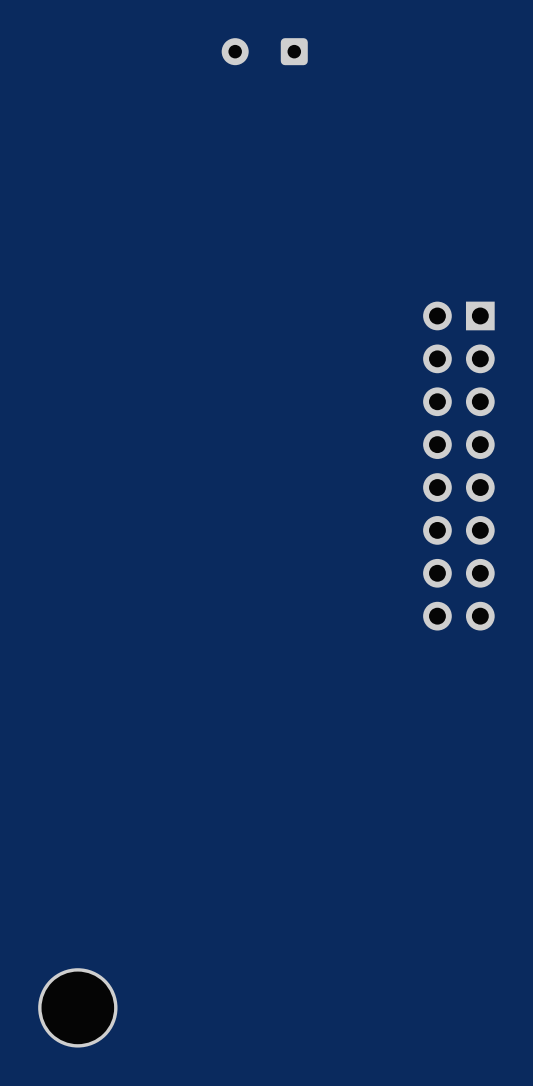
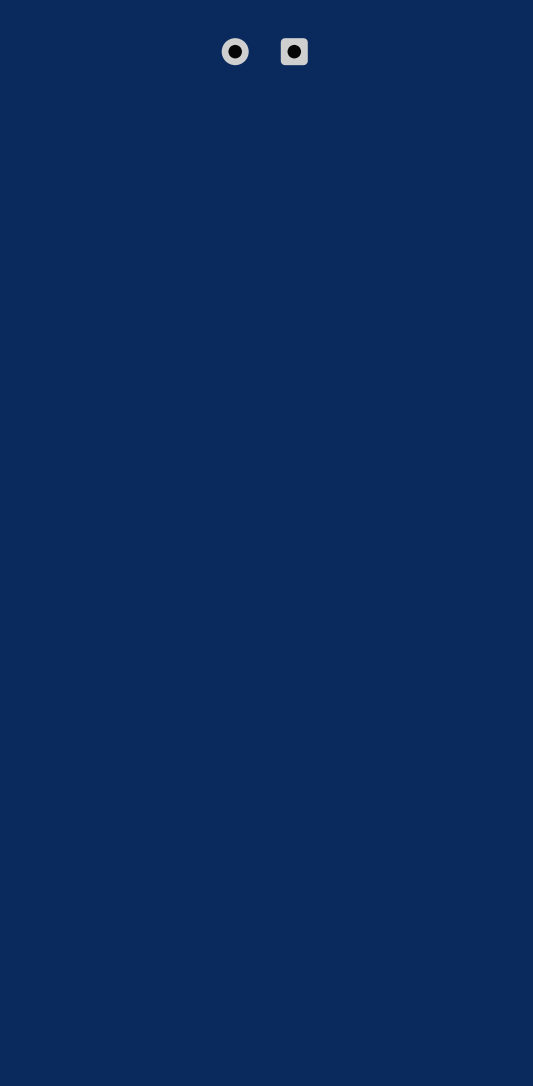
part: (458, 466) -> none
part: (77, 1007) -> none

